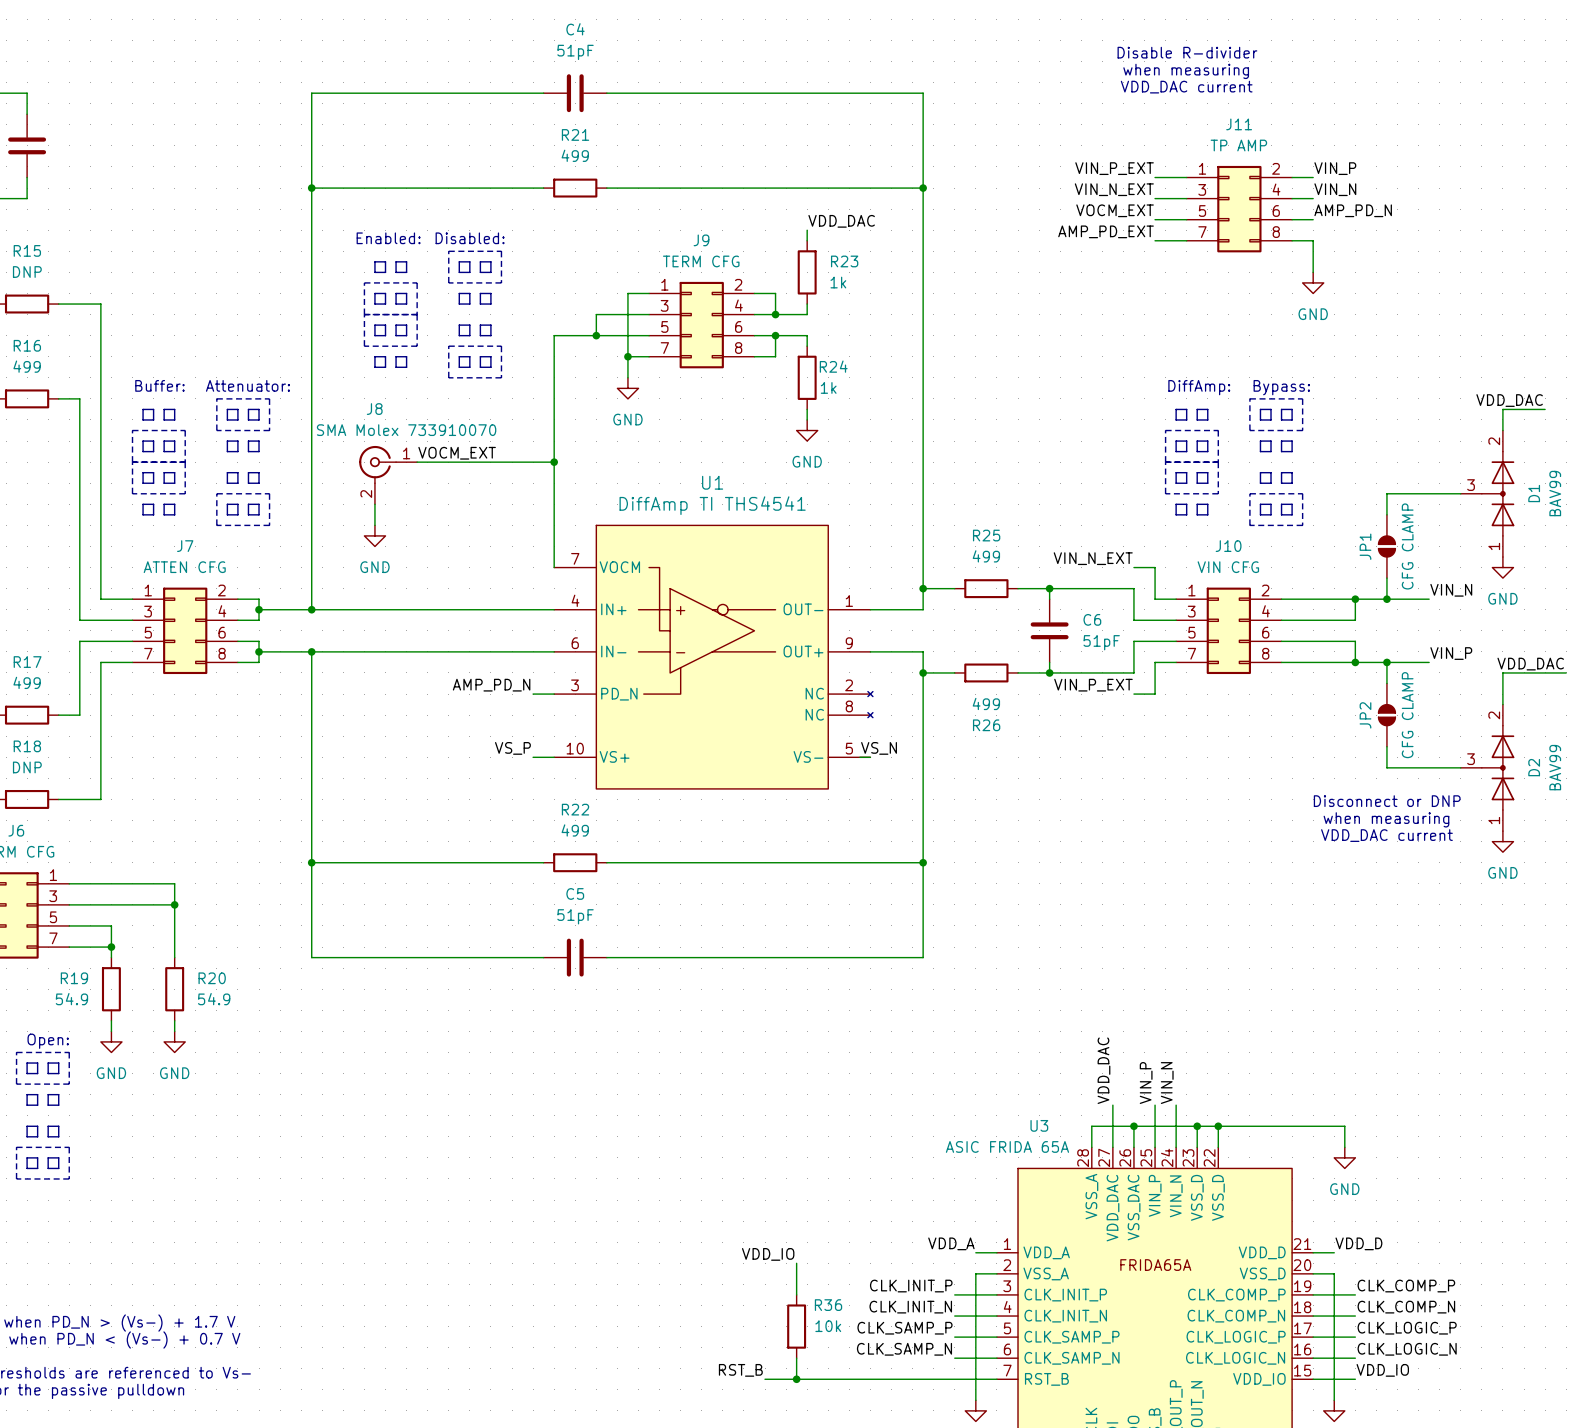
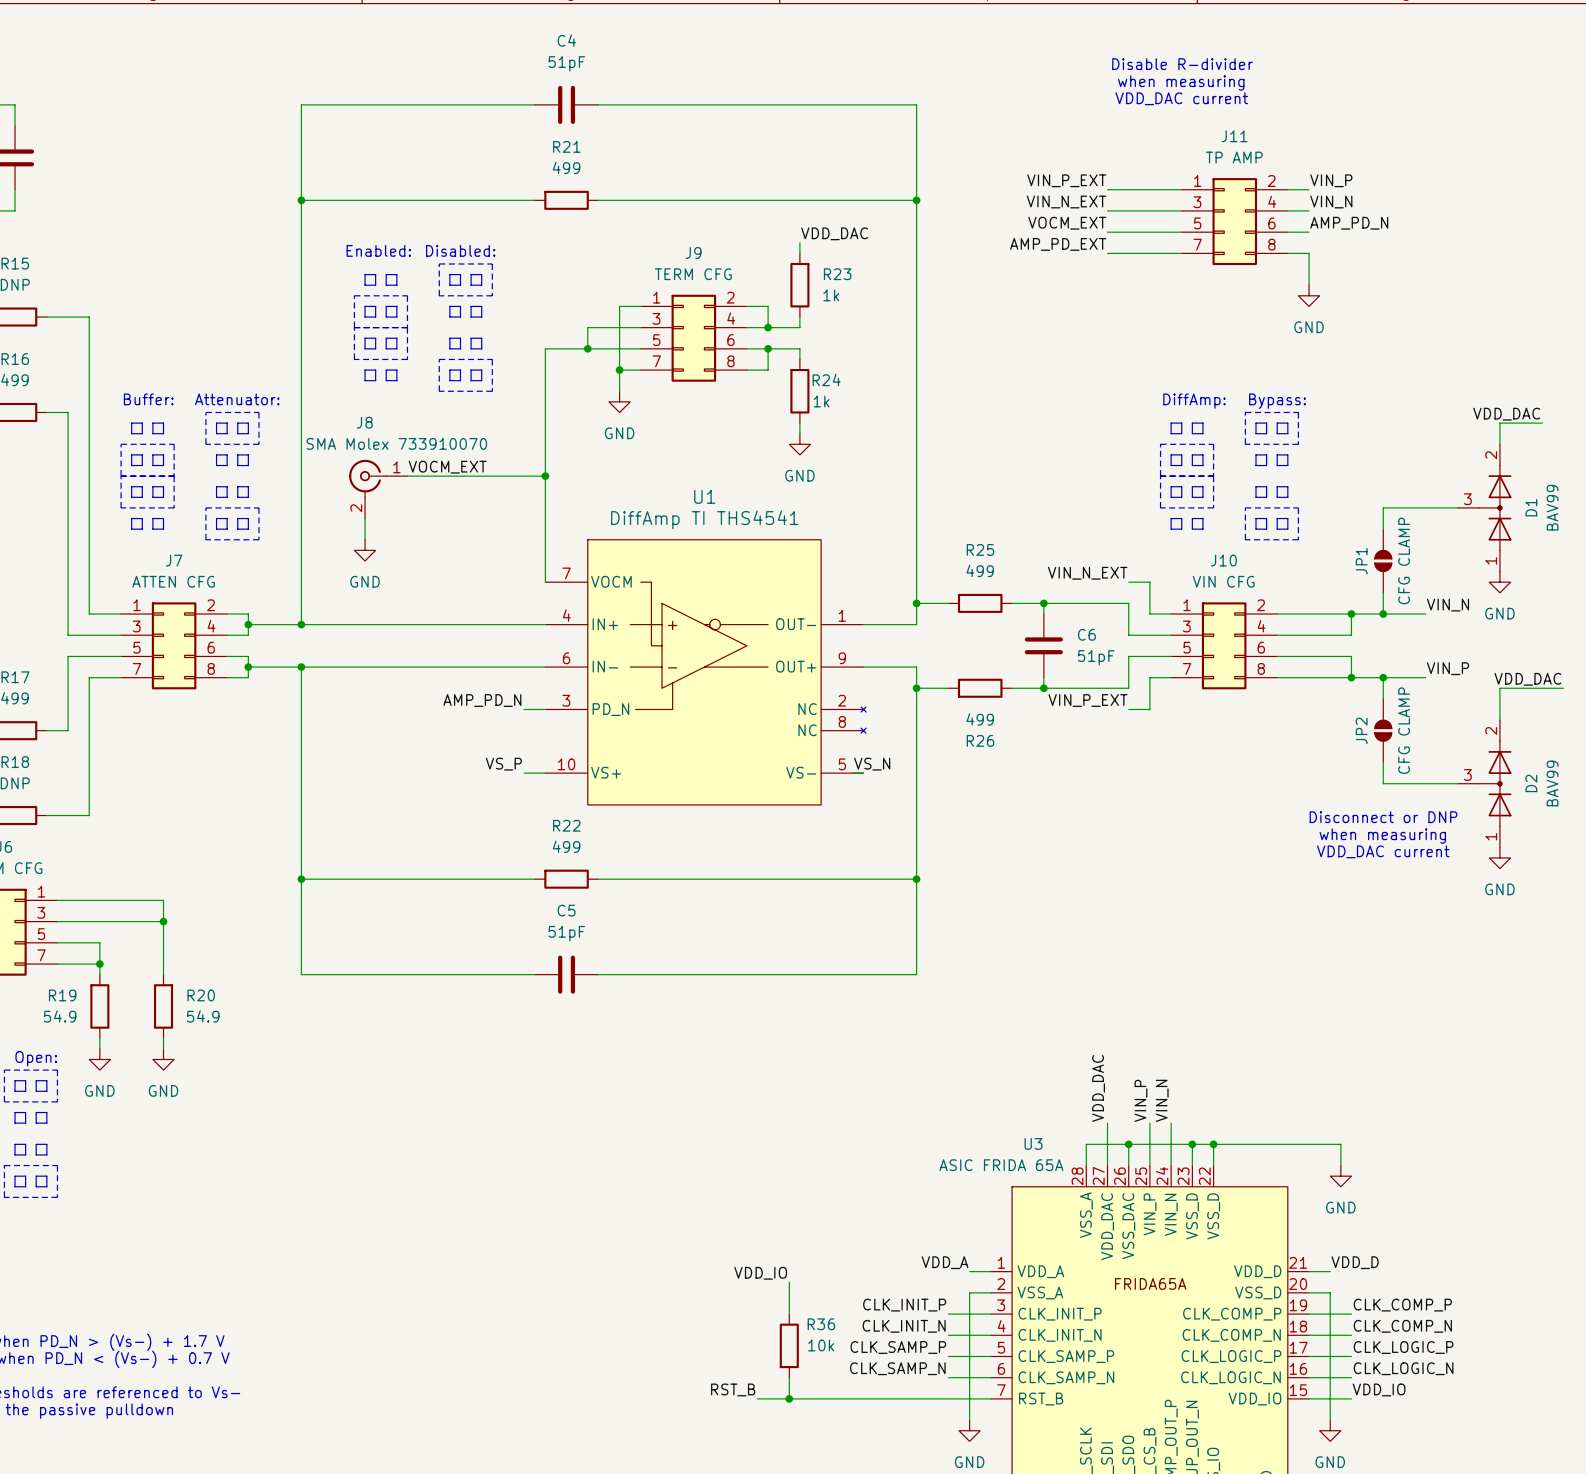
label position: VIN_P_EXT (1114, 168) -> VIN_P_EXT (1066, 180)
wire: none -> (1107, 189) (1149, 189)
label position: VIN_N_EXT (1114, 189) -> VIN_N_EXT (1066, 201)
wire: none -> (1107, 210) (1149, 210)
label position: VOCM_EXT (1115, 210) -> VOCM_EXT (1067, 223)
wire: none -> (1107, 232) (1149, 232)
label position: AMP_PD_EXT (1106, 231) -> AMP_PD_EXT (1058, 244)
wire: none -> (1107, 253) (1149, 253)

